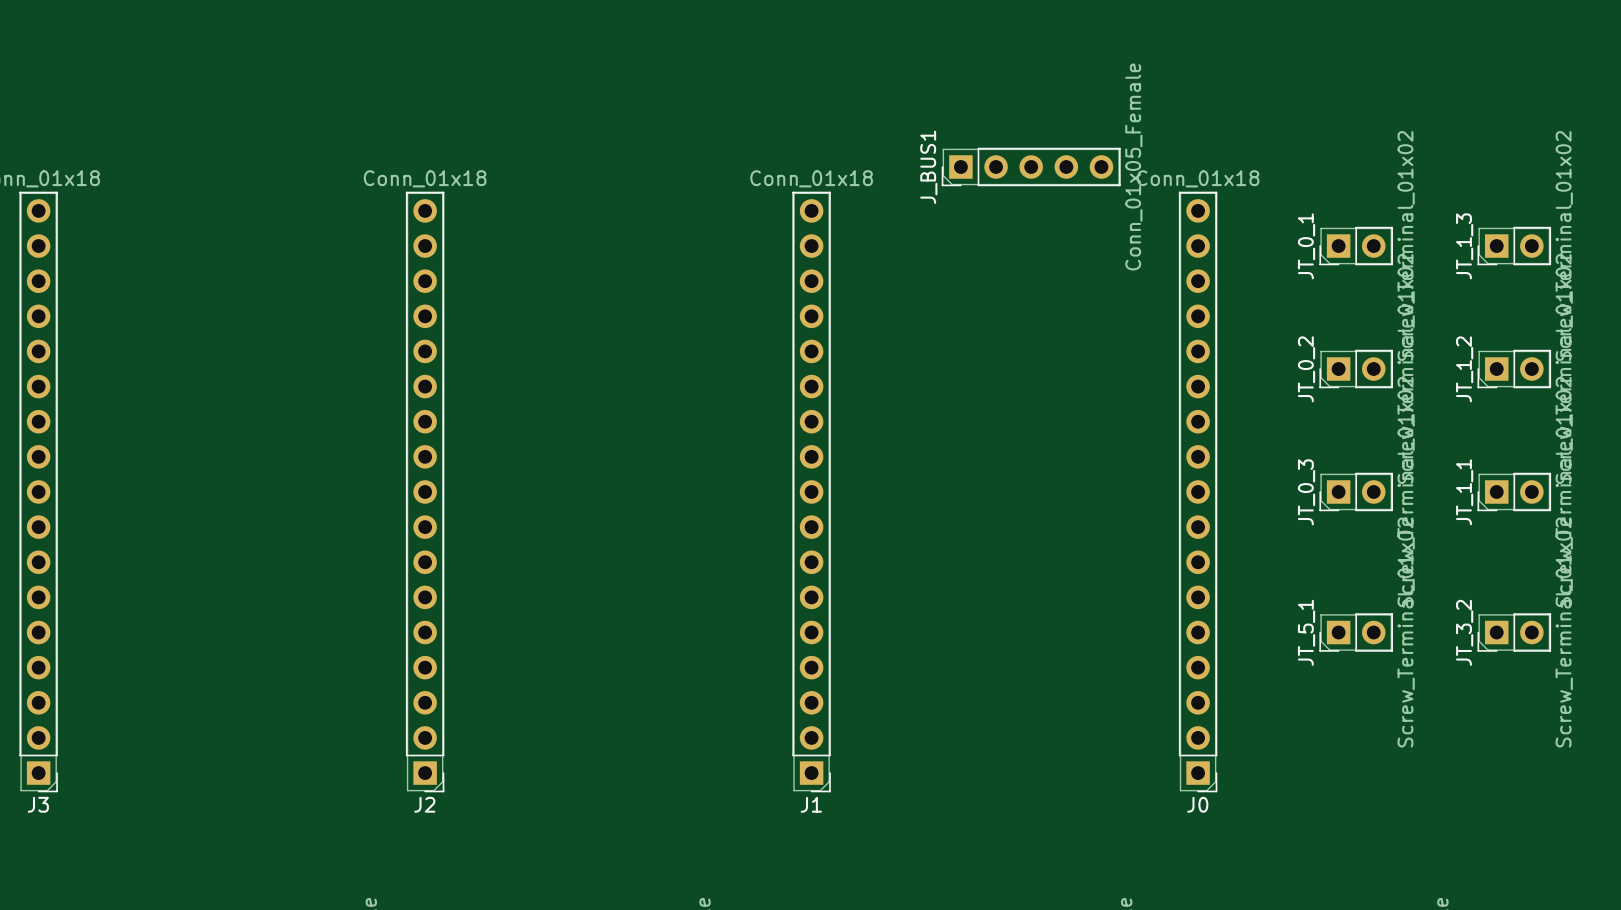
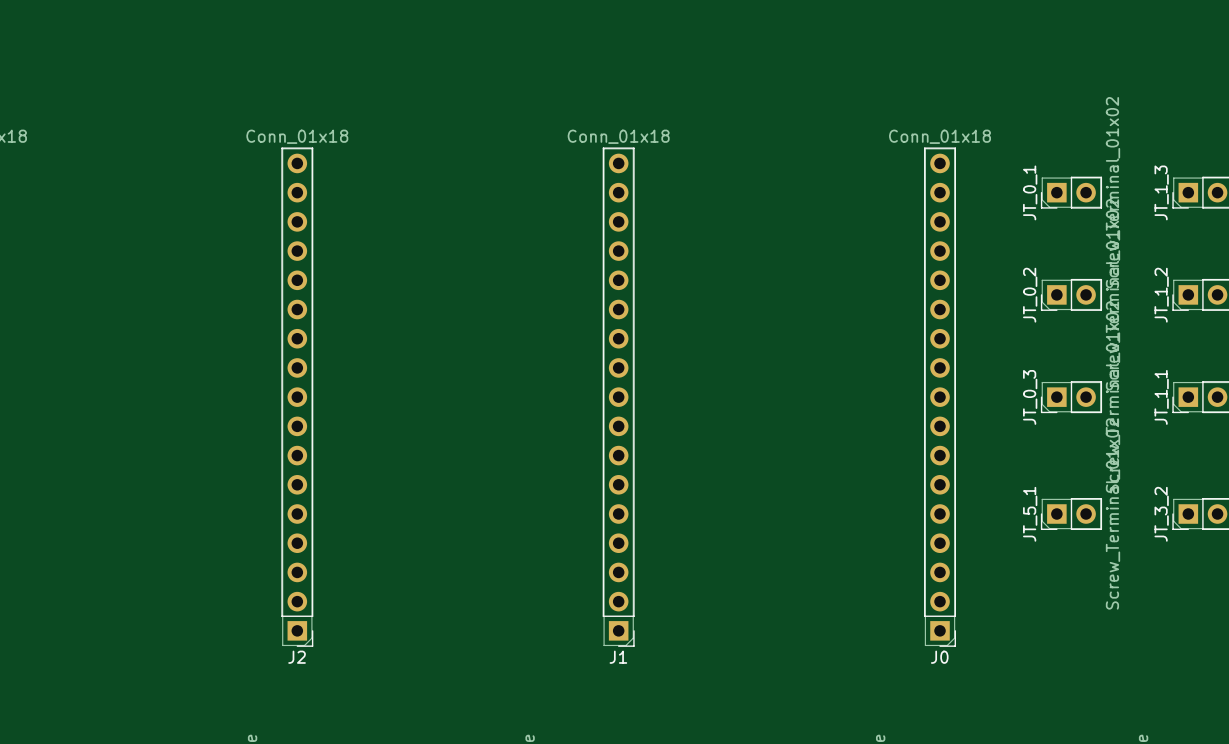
J_BUS1: Conn_01x05_Female (1031, 166) -> none

